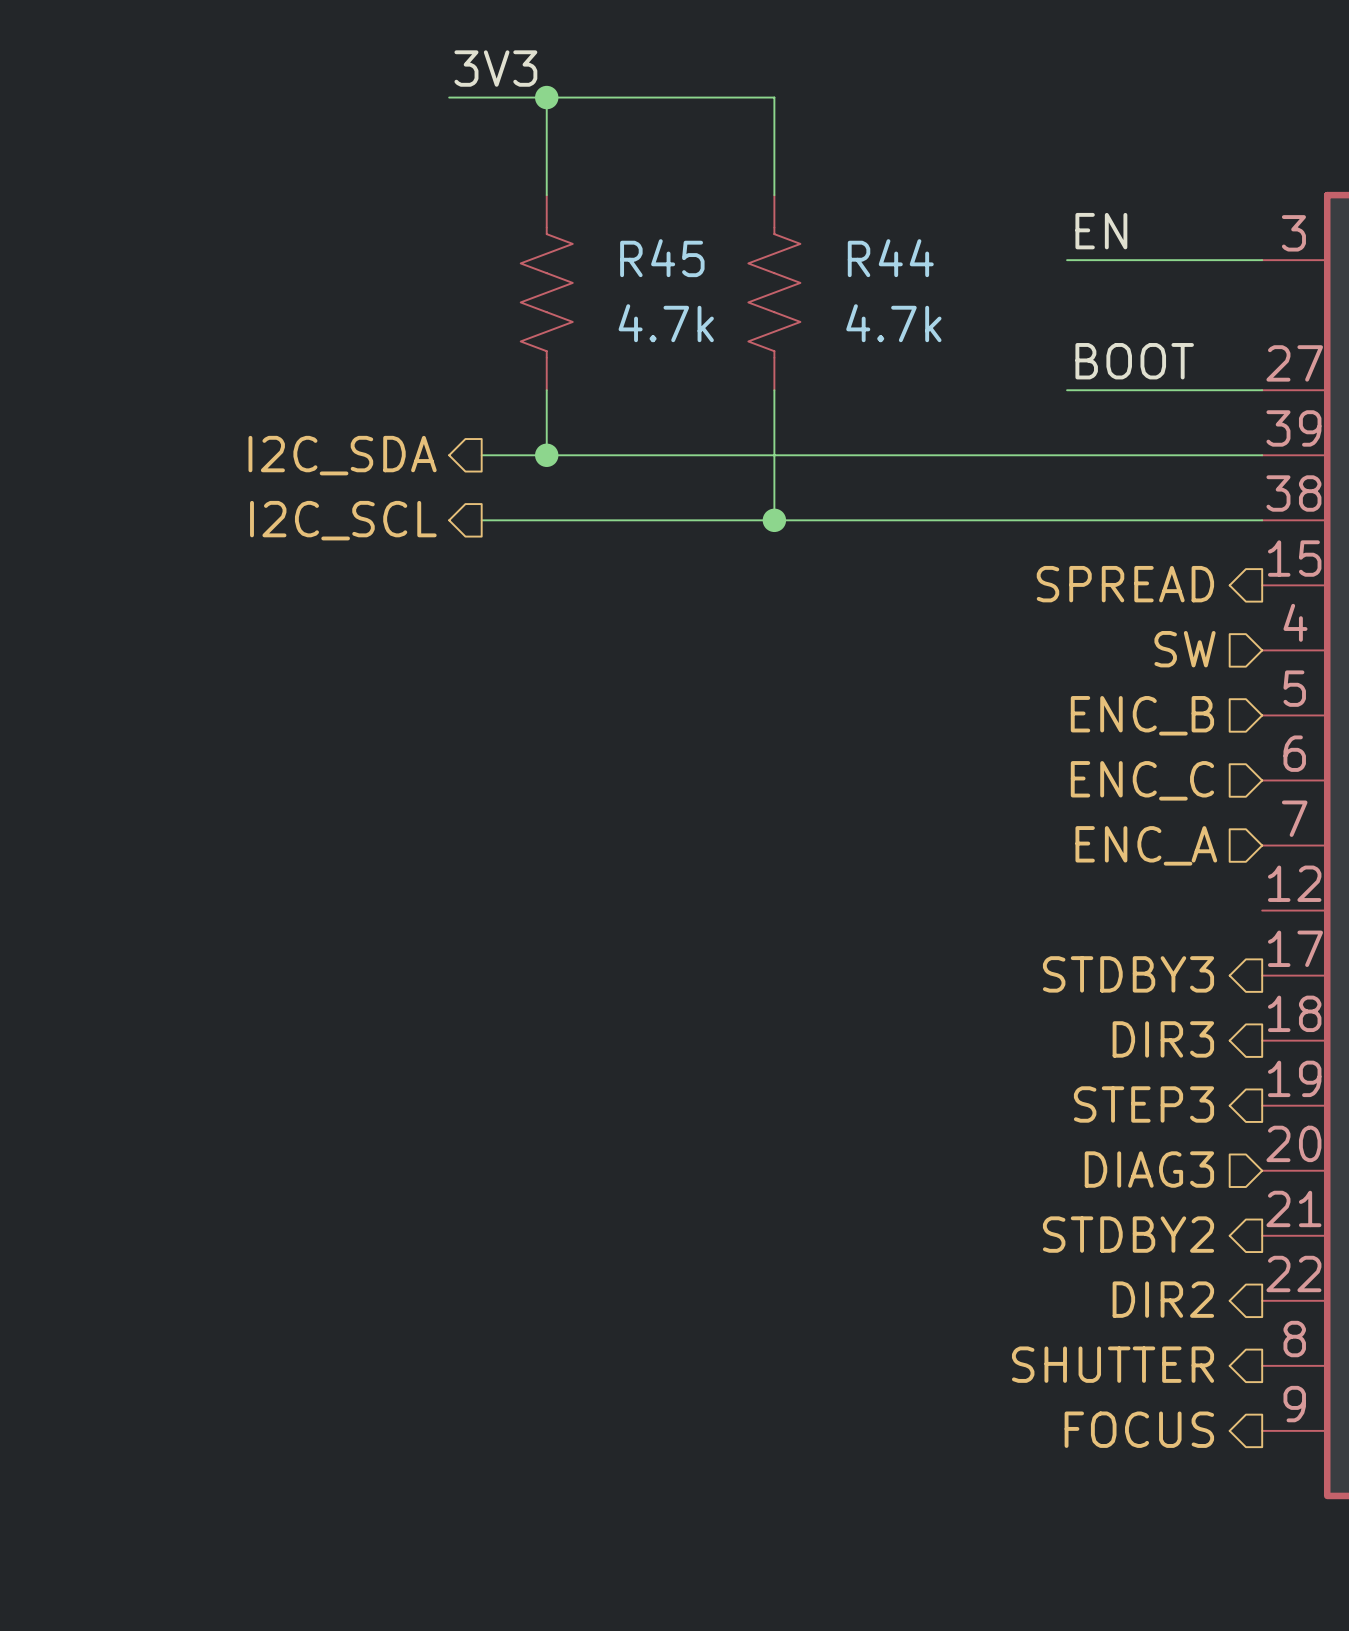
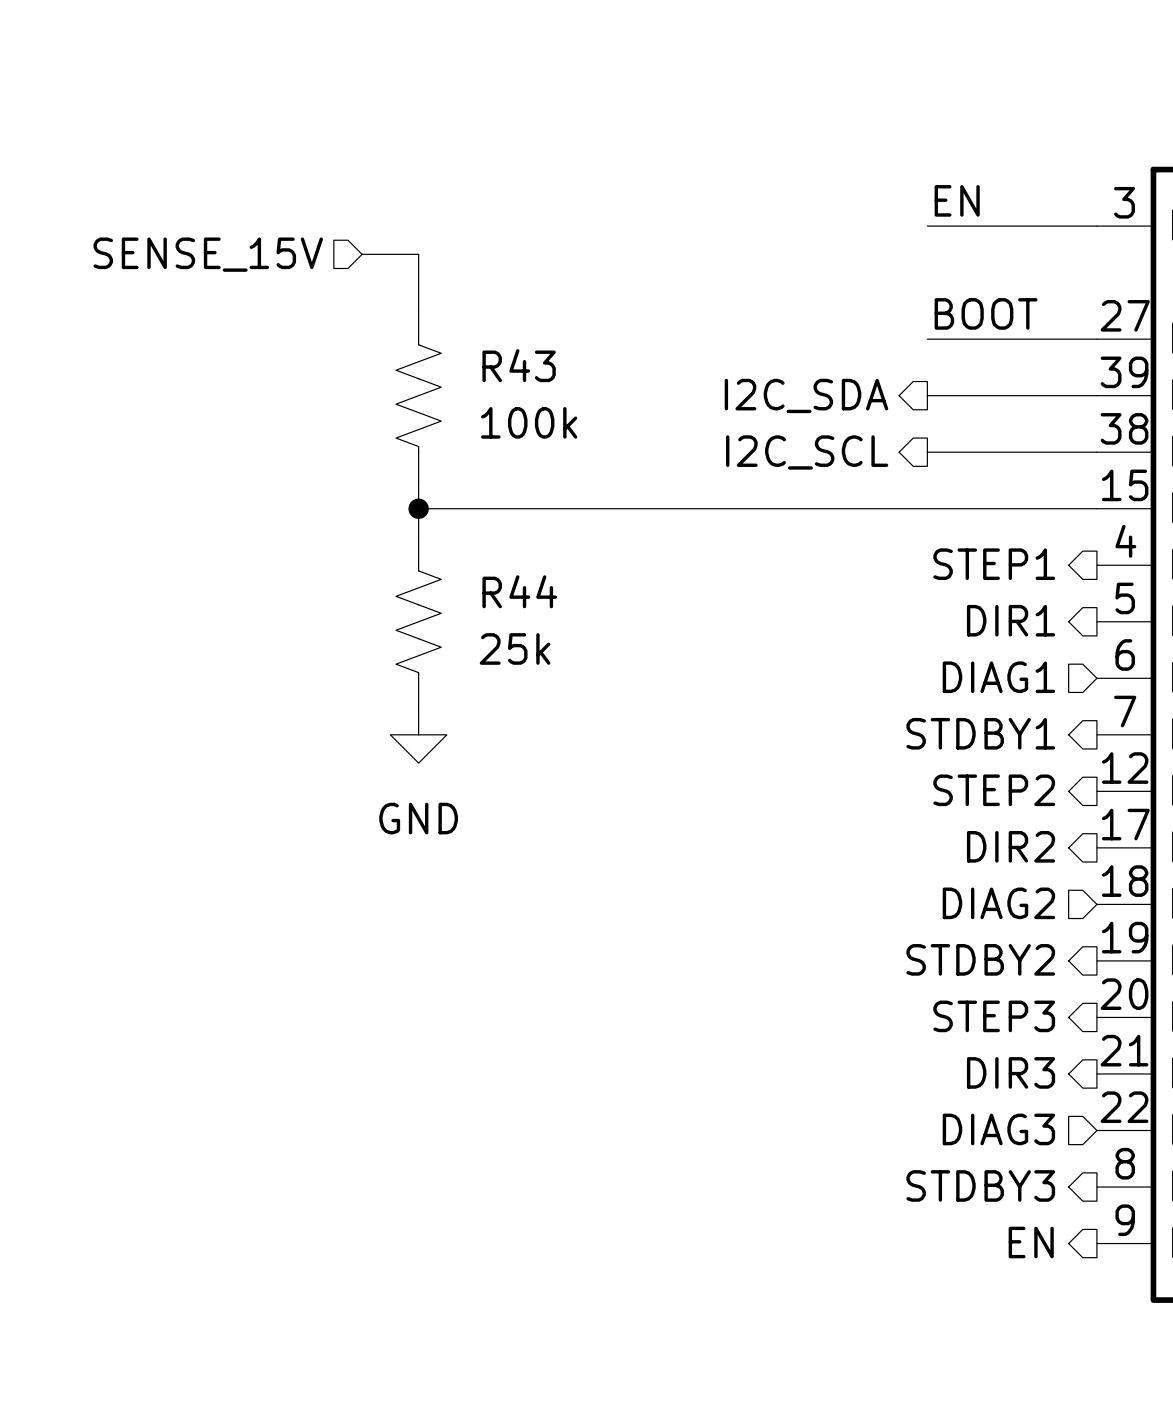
label: 3V3 (495, 68) -> none
wire: (449, 97) (774, 97) (774, 195) -> none
wire: (546, 97) (546, 195) -> none
junction: (546, 97) -> none
wire: none -> (362, 254) (418, 254) (418, 310)
R45: 4.7k (546, 292) -> none
R44 position: (774, 292) -> (418, 621)
hierarchical label: none -> SENSE_15V (208, 254)
R44 value: 4.7k (893, 323) -> 25k (515, 648)
wire: (546, 390) (546, 455) -> (418, 480) (418, 536)
wire: (774, 390) (774, 520) -> none
hierarchical label position: I2C_SDA (342, 455) -> I2C_SDA (806, 395)
wire: (481, 455) (1067, 455) -> none
R43: none -> 100k (418, 395)
junction position: (546, 455) -> (418, 508)
hierarchical label position: I2C_SCL (343, 520) -> I2C_SCL (807, 452)
wire: (481, 520) (1067, 520) -> none
junction: (774, 520) -> none
hierarchical label: SPREAD (1125, 584) -> none
wire: none -> (418, 508) (1096, 508)
hierarchical label shape: input (1185, 649) -> output (994, 564)
hierarchical label: SW (1185, 649) -> STEP1 (994, 564)
hierarchical label shape: input (1142, 715) -> output (1011, 620)
hierarchical label: ENC_B (1142, 715) -> DIR1 (1011, 620)
hierarchical label: ENC_C (1142, 780) -> DIAG1 (998, 677)
power symbol: none -> GND (418, 734)
hierarchical label shape: input (1146, 845) -> output (980, 733)
hierarchical label: ENC_A (1146, 845) -> STDBY1 (980, 733)
hierarchical label: none -> STEP2 (994, 790)
hierarchical label: STDBY3 (1128, 974) -> DIR2 (1011, 846)
hierarchical label shape: output (1163, 1039) -> input (998, 903)
hierarchical label: DIR3 (1163, 1039) -> DIAG2 (998, 903)
hierarchical label: STEP3 (1143, 1104) -> STDBY2 (980, 959)
hierarchical label shape: input (1149, 1169) -> output (994, 1016)
hierarchical label: DIAG3 (1149, 1169) -> STEP3 (994, 1016)
hierarchical label: STDBY2 (1128, 1234) -> DIR3 (1011, 1072)
hierarchical label shape: output (1163, 1299) -> input (998, 1129)
hierarchical label: DIR2 (1163, 1299) -> DIAG3 (998, 1129)
hierarchical label: SHUTTER (1113, 1364) -> STDBY3 (980, 1185)
hierarchical label: FOCUS (1139, 1429) -> EN (1031, 1242)

